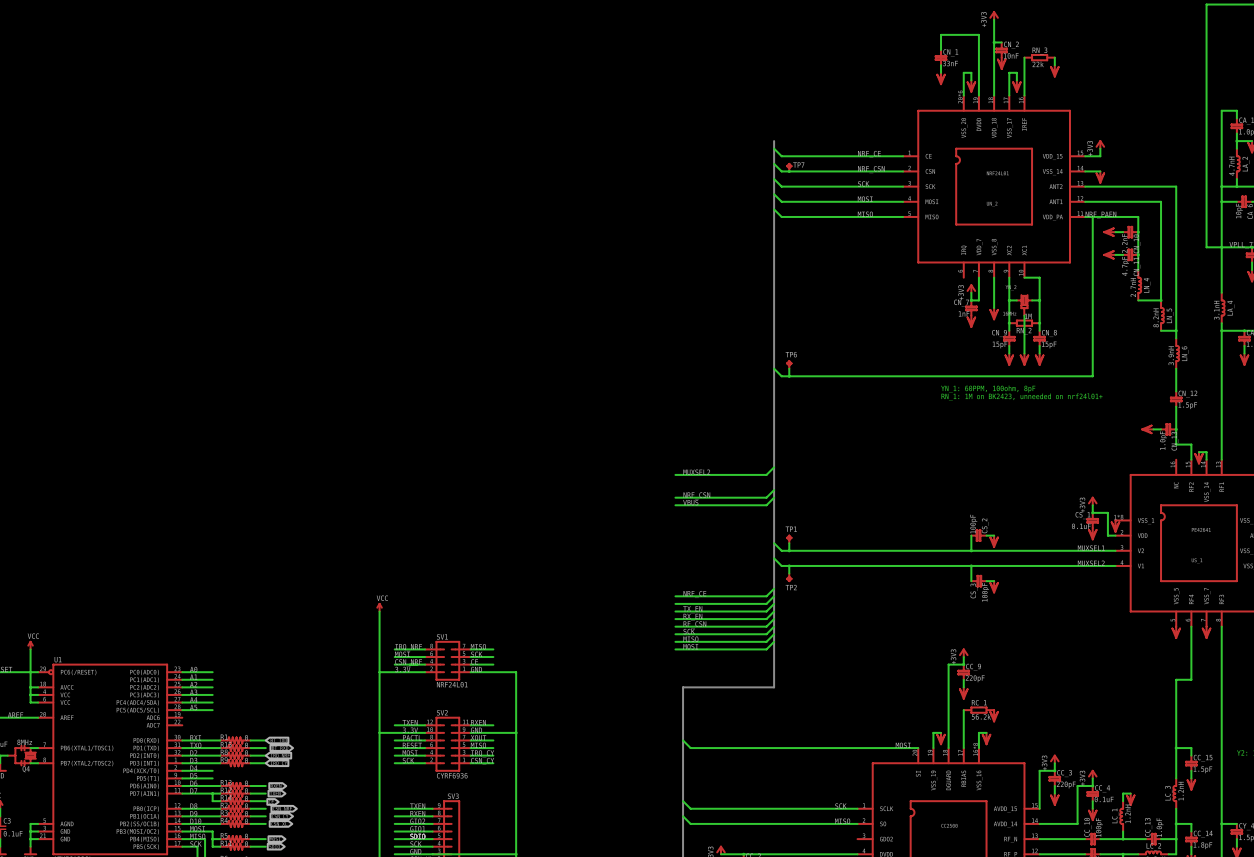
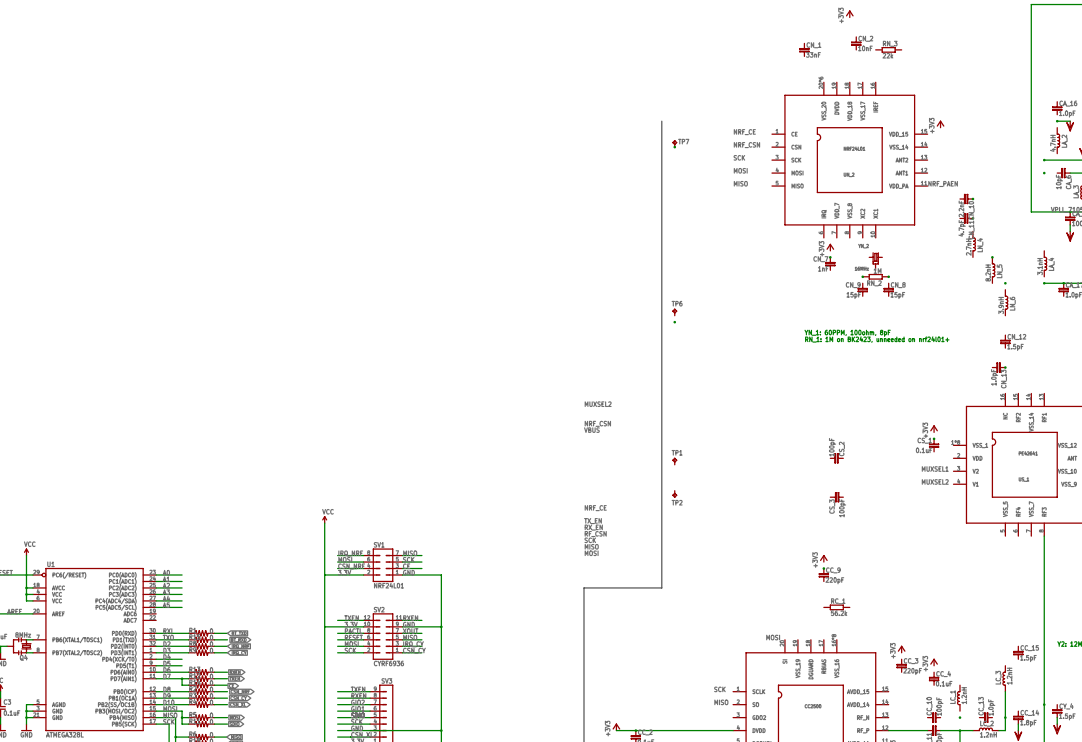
wire: (994, 19) (994, 95) -> none
wire: (994, 42) (1001, 42) -> none
wire: (941, 50) (941, 34) (978, 34) (978, 95) -> none
wire: (1024, 57) (1024, 95) -> none
wire: (1054, 57) (1054, 65) -> none
power symbol: (1001, 63) -> none
wire: (941, 65) (941, 72) -> none
power symbol: (1054, 71) -> none
power symbol: (941, 78) -> none
wire: (971, 80) (971, 72) (963, 72) (963, 95) -> none
wire: (1016, 80) (1016, 72) (1009, 72) (1009, 95) -> none
power symbol: (971, 86) -> none
power symbol: (1016, 86) -> none
wire: (1236, 118) (1236, 110) (1221, 110) (1221, 292) -> none
wire: (1236, 133) (1236, 148) -> none
wire: (774, 148) (781, 156) (903, 156) -> none
wire: (1100, 148) (1100, 156) (1085, 156) -> none
wire: (774, 163) (781, 171) (903, 171) -> none
wire: (1085, 171) (1100, 171) -> none
power symbol: (1100, 177) -> none
wire: (774, 179) (781, 186) (903, 186) -> none
wire: (1236, 179) (1236, 186) -> none
wire: (1085, 186) (1176, 186) (1176, 338) -> none
wire: (774, 194) (781, 201) (903, 201) -> none
wire: (1085, 201) (1161, 201) (1161, 300) (1138, 300) -> none
wire: (1221, 201) (1236, 201) -> none
wire: (774, 209) (781, 216) (903, 216) -> none
wire: (1085, 216) (1138, 216) (1138, 270) -> none
wire: (1092, 216) (1092, 376) (781, 376) (774, 368) -> none
power symbol: (1109, 232) -> none
wire: (1115, 232) (1123, 232) -> none
power symbol: (1109, 254) -> none
wire: (1115, 254) (1123, 254) -> none
wire: (978, 277) (978, 300) (971, 300) (971, 292) -> none
wire: (994, 277) (994, 308) -> none
wire: (1009, 277) (1009, 330) -> none
wire: (1024, 277) (1039, 277) (1039, 330) -> none
wire: (1009, 300) (1016, 300) -> none
wire: (1032, 300) (1039, 300) -> none
power symbol: (994, 313) -> none
wire: (1024, 315) (1024, 353) -> none
power symbol: (971, 321) -> none
wire: (1221, 323) (1221, 459) -> none
wire: (1161, 330) (1176, 330) -> none
wire: (1009, 345) (1009, 353) -> none
wire: (1039, 345) (1039, 353) -> none
wire: (1244, 345) (1244, 353) -> none
power symbol: (1009, 359) -> none
power symbol: (1024, 359) -> none
power symbol: (1039, 359) -> none
power symbol: (1244, 359) -> none
wire: (789, 368) (789, 376) -> none
wire: (1176, 368) (1176, 391) -> none
wire: (1176, 406) (1176, 444) (1191, 444) (1191, 459) -> none
power symbol: (1147, 429) -> none
wire: (1153, 429) (1161, 429) -> none
wire: (1198, 452) (1206, 452) (1206, 459) -> none
power symbol: (1198, 458) -> none
wire: (774, 467) (766, 474) (675, 474) -> none
wire: (774, 490) (766, 497) (675, 497) -> none
wire: (774, 497) (766, 505) (675, 505) -> none
wire: (1092, 505) (1092, 512) (1107, 512) (1107, 535) (1115, 535) -> none
power symbol: (1115, 526) -> none
power symbol: (1092, 533) -> none
wire: (971, 535) (971, 550) -> none
wire: (986, 535) (994, 535) -> none
power symbol: (994, 541) -> none
wire: (774, 543) (781, 550) (1115, 550) -> none
wire: (789, 543) (789, 550) -> none
wire: (774, 558) (781, 565) (1115, 565) -> none
wire: (789, 565) (789, 573) -> none
wire: (971, 565) (971, 581) -> none
wire: (986, 581) (994, 581) -> none
power symbol: (994, 587) -> none
wire: (774, 588) (766, 596) (675, 596) -> none
wire: (774, 596) (766, 603) (675, 603) -> none
wire: (774, 603) (766, 611) (675, 611) -> none
wire: (774, 611) (766, 619) (675, 619) -> none
wire: (774, 619) (766, 626) (675, 626) -> none
wire: (774, 626) (766, 634) (675, 634) -> none
wire: (1191, 626) (1191, 679) (1176, 679) (1176, 778) -> none
power symbol: (1176, 632) -> none
power symbol: (1206, 632) -> none
wire: (774, 634) (766, 641) (675, 641) -> none
wire: (774, 641) (766, 649) (675, 649) -> none
wire: (963, 657) (963, 664) (948, 664) (948, 748) -> none
wire: (963, 679) (963, 687) -> none
power symbol: (963, 693) -> none
wire: (963, 710) (963, 748) -> none
power symbol: (994, 716) -> none
wire: (941, 732) (933, 732) (933, 748) -> none
wire: (986, 732) (978, 732) (978, 748) -> none
power symbol: (941, 738) -> none
power symbol: (986, 738) -> none
wire: (683, 740) (690, 748) (918, 748) -> none
wire: (1176, 748) (1191, 748) (1191, 755) -> none
wire: (1054, 763) (1054, 770) (1039, 770) (1039, 808) -> none
wire: (1191, 770) (1191, 778) -> none
wire: (1092, 778) (1092, 785) (1077, 785) (1077, 823) (1039, 823) -> none
power symbol: (1191, 784) -> none
wire: (1054, 785) (1054, 793) -> none
wire: (1130, 793) (1123, 793) (1123, 801) -> none
power symbol: (1054, 799) -> none
power symbol: (1130, 799) -> none
wire: (683, 801) (690, 808) (857, 808) -> none
wire: (1092, 801) (1092, 808) -> none
power symbol: (1092, 814) -> none
wire: (683, 816) (690, 823) (857, 823) -> none
wire: (1176, 823) (1191, 823) (1191, 831) -> none
wire: (1221, 823) (1236, 823) -> none
wire: (1123, 831) (1123, 839) -> none
wire: (1039, 839) (1085, 839) -> none
wire: (1100, 839) (1145, 839) -> none
wire: (1161, 839) (1176, 839) -> none

